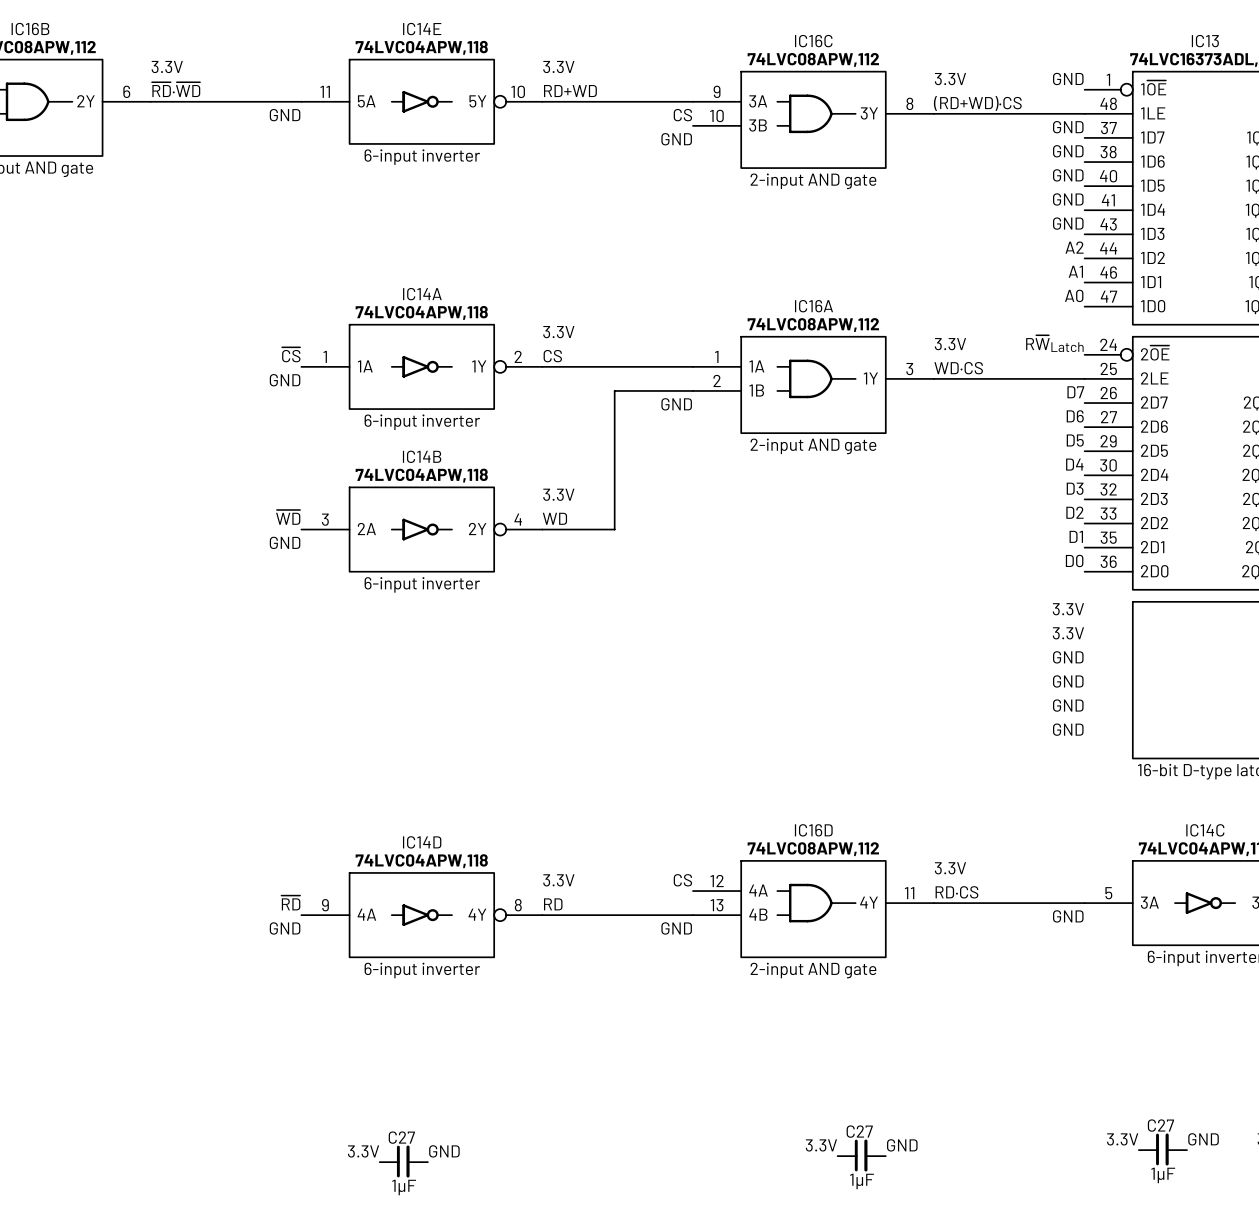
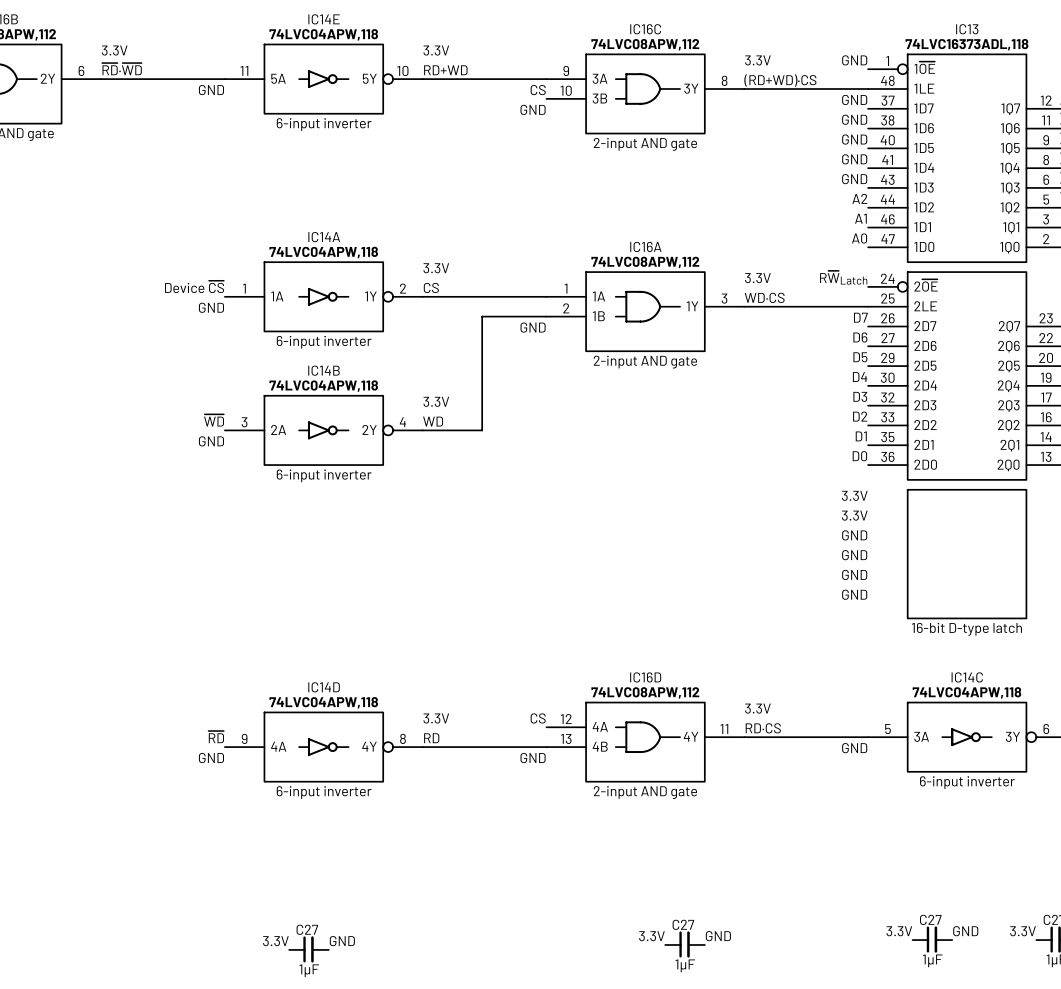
label: ~{CS} (291, 354) -> Device ~{CS} (194, 286)

